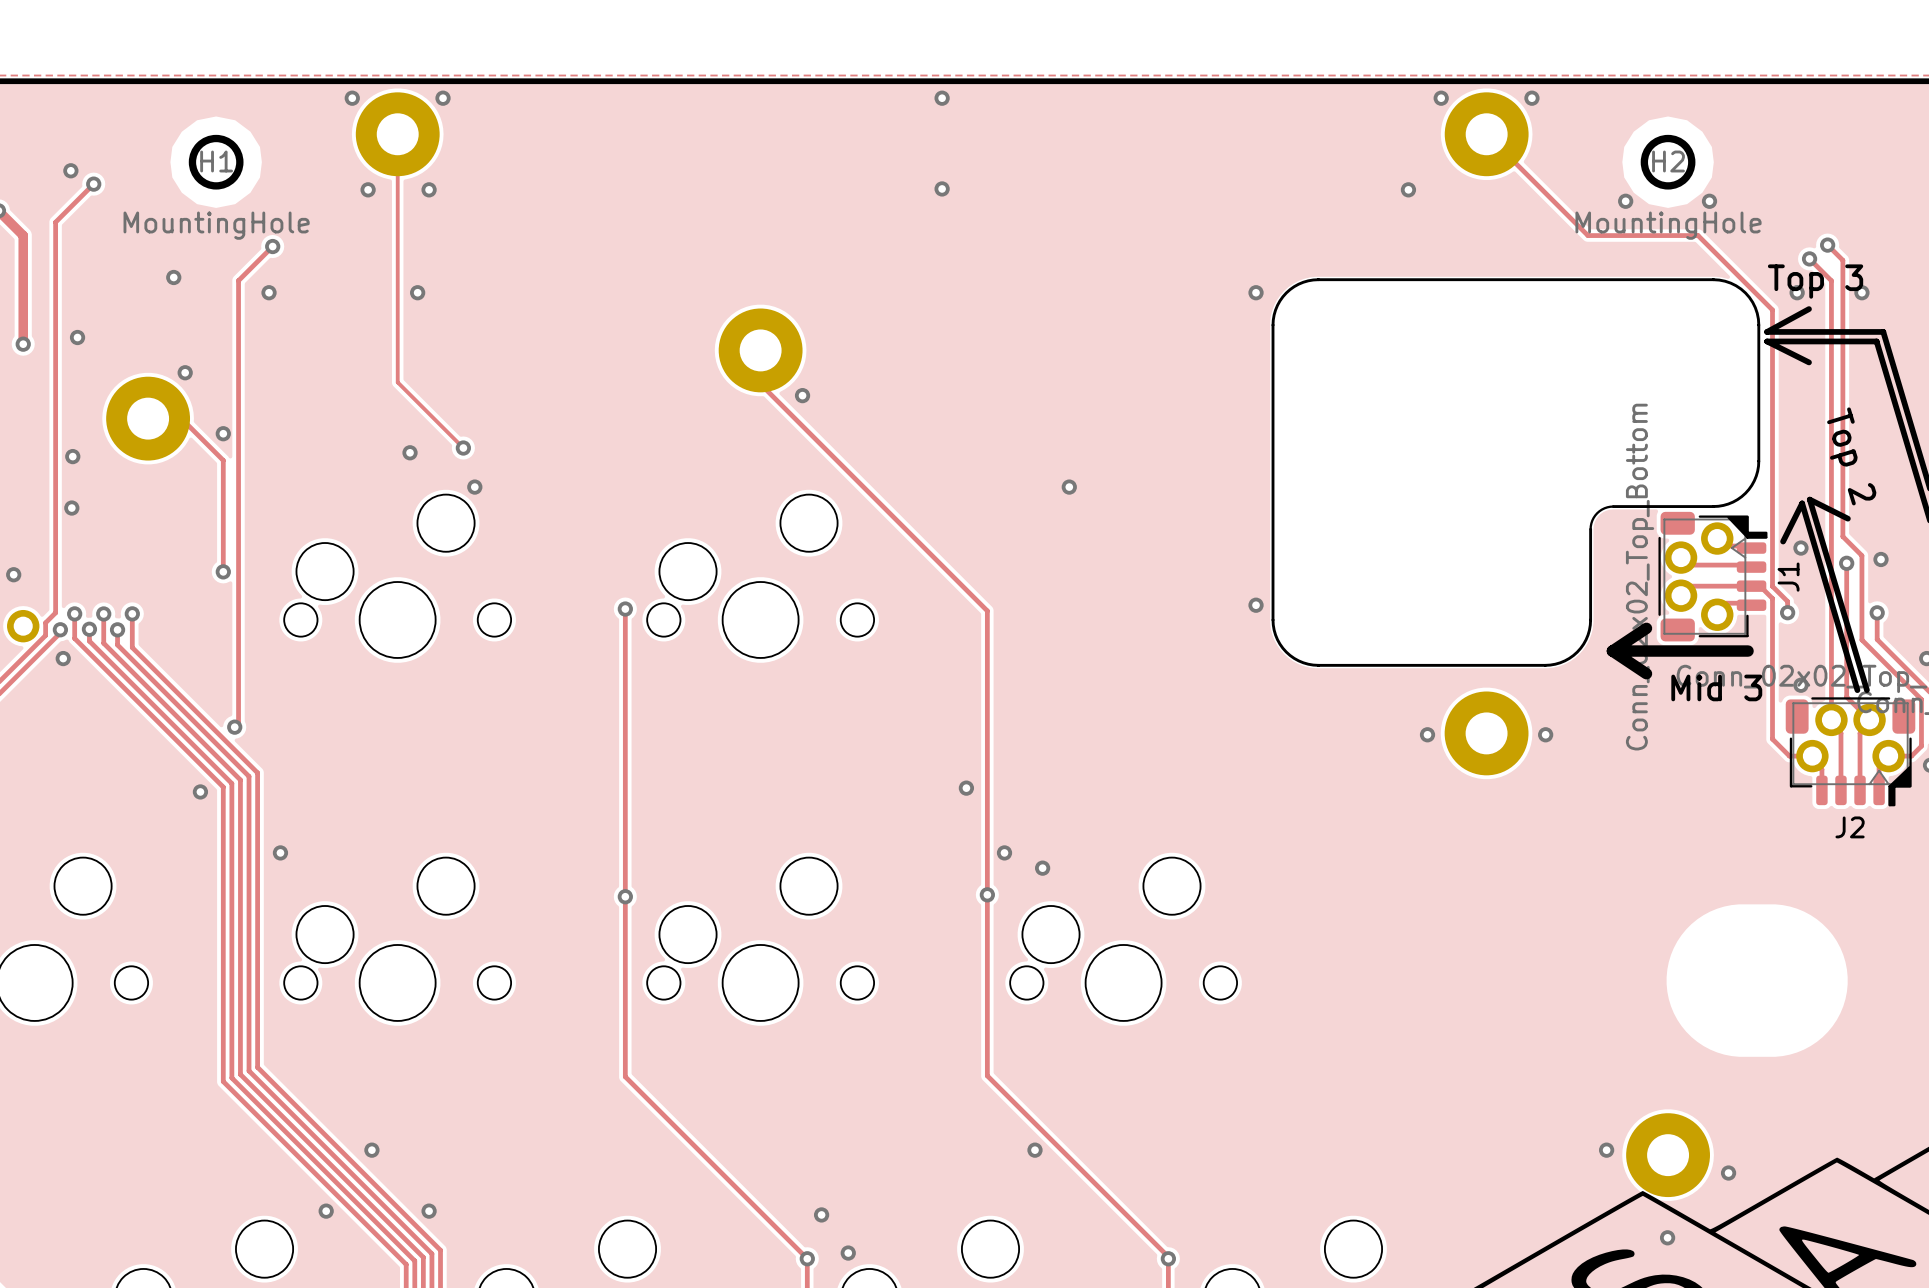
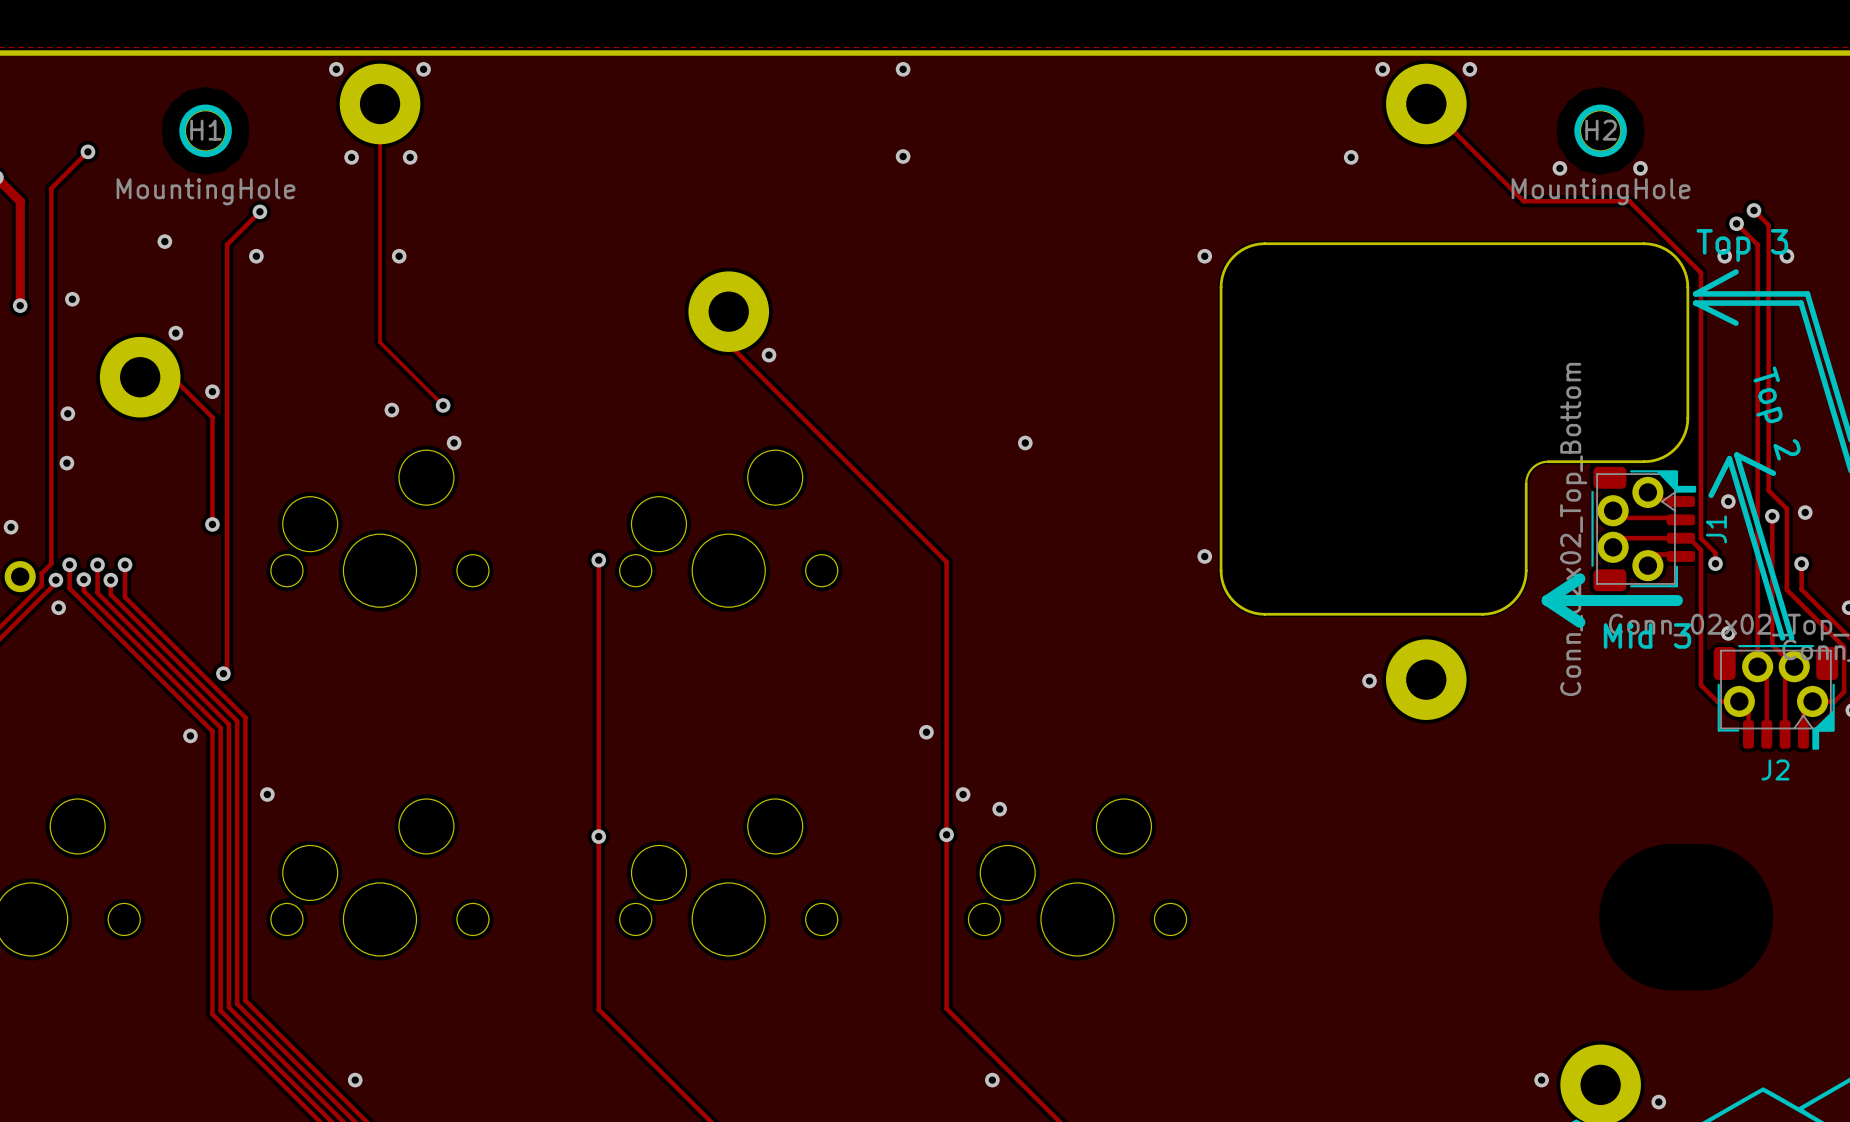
via: (70, 170) -> none
via: (1545, 734) -> none

